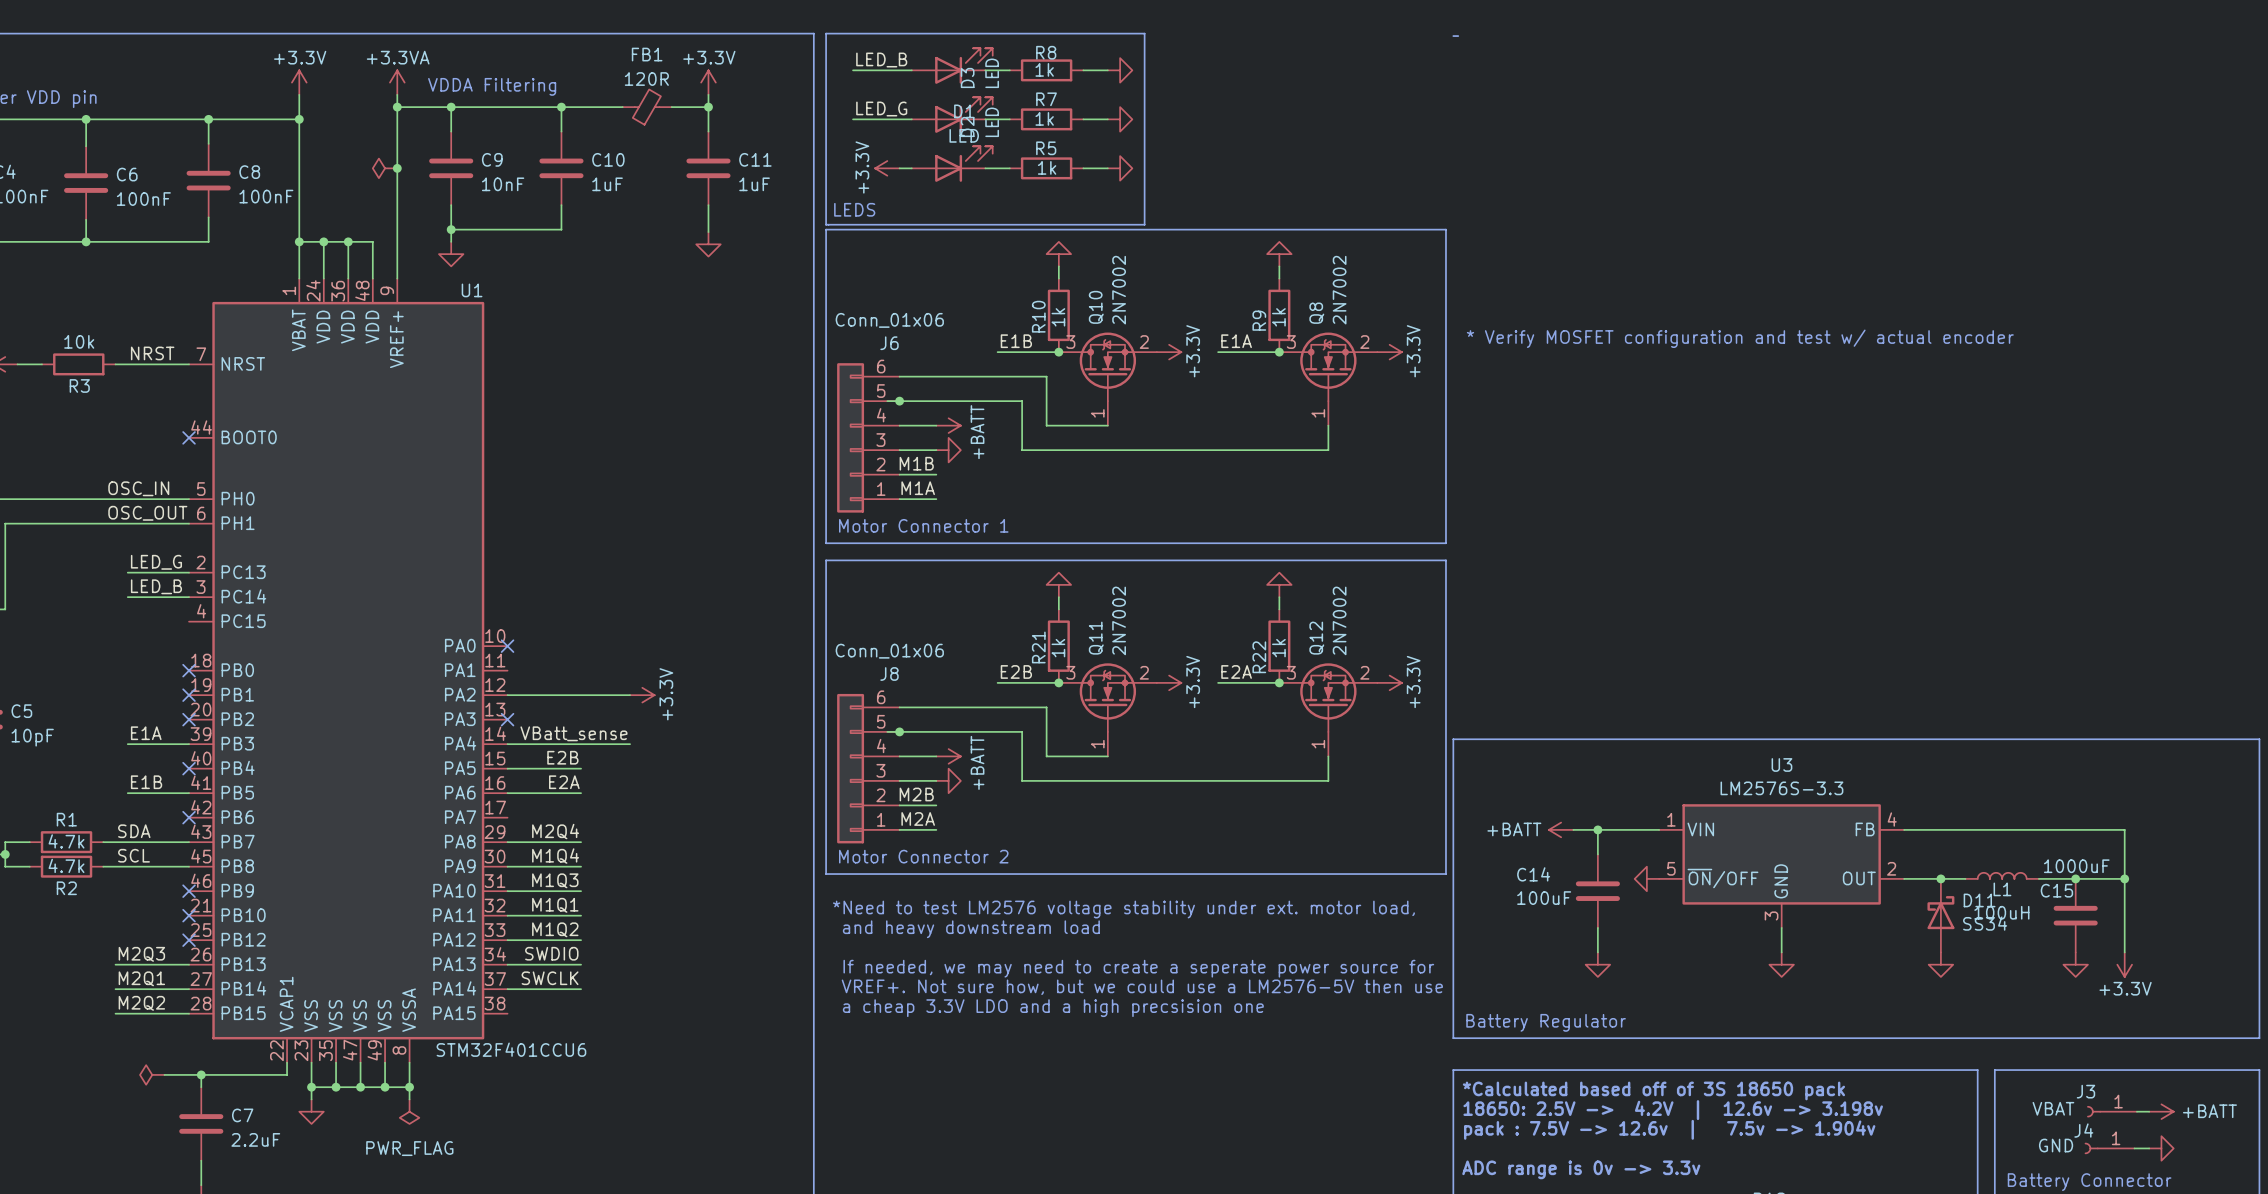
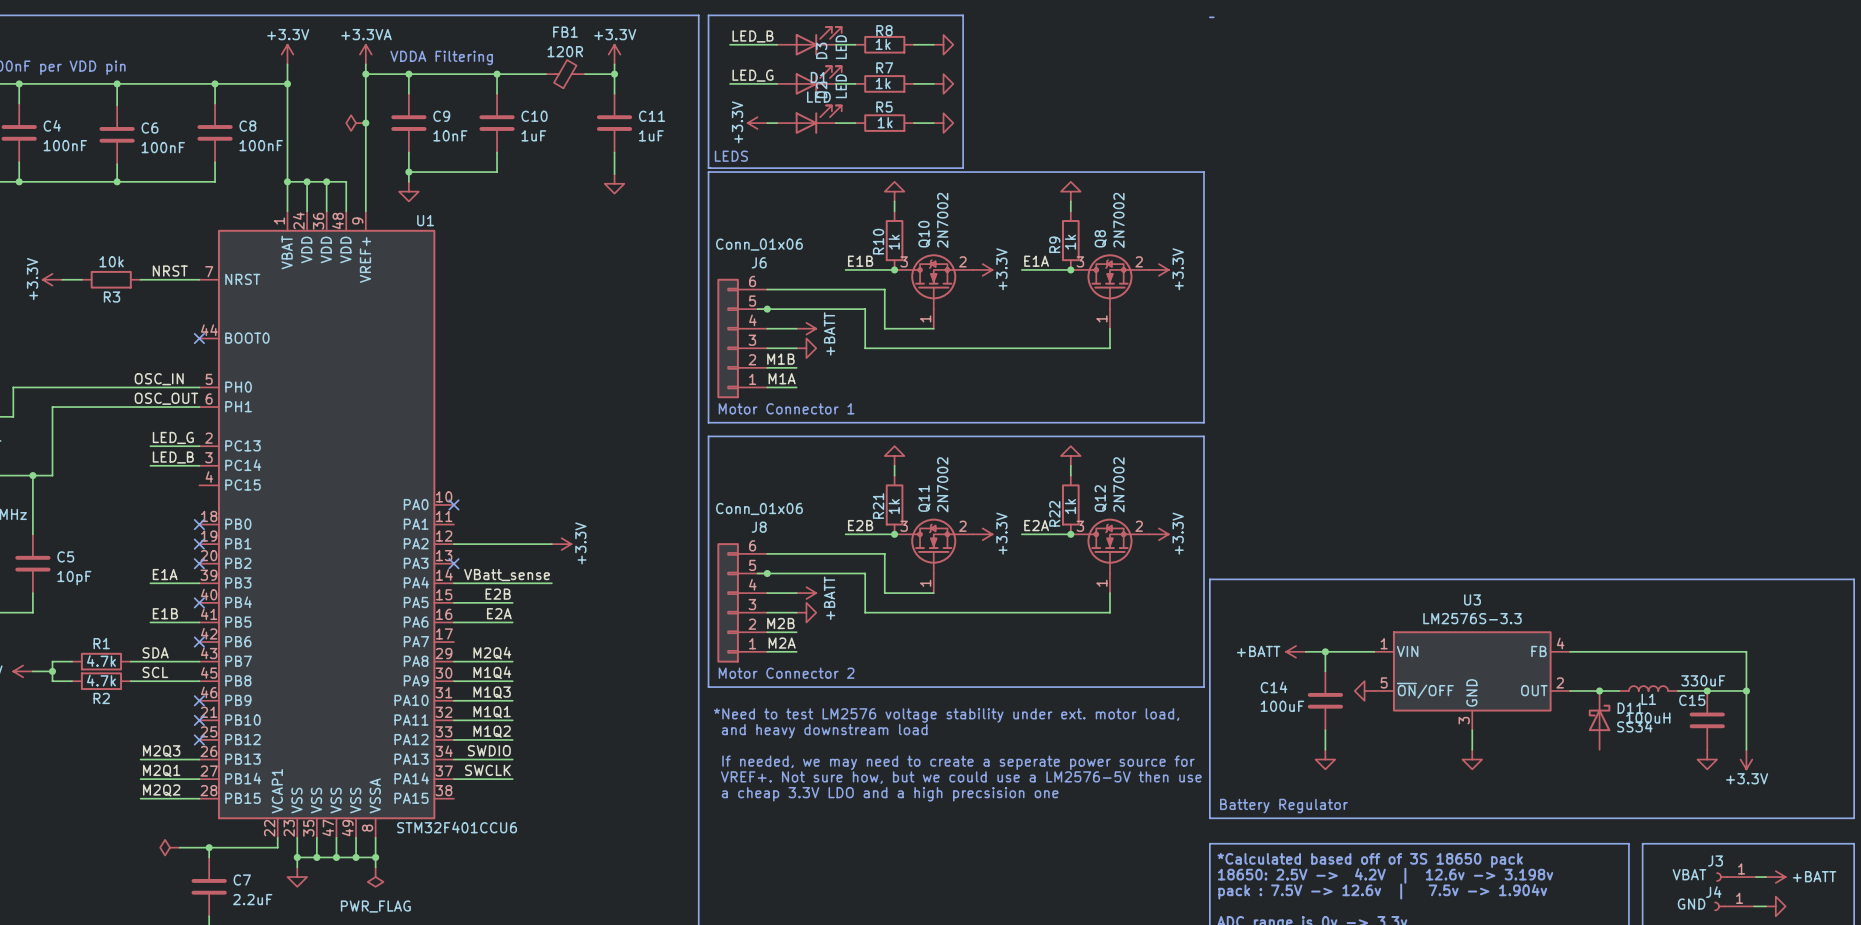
text: * Verify MOSFET configuration and test w/ actual encoder (1740, 338) -> none
C15 value: 1000uF (2076, 866) -> 330uF (1703, 680)
power symbol: (1940, 964) -> none

